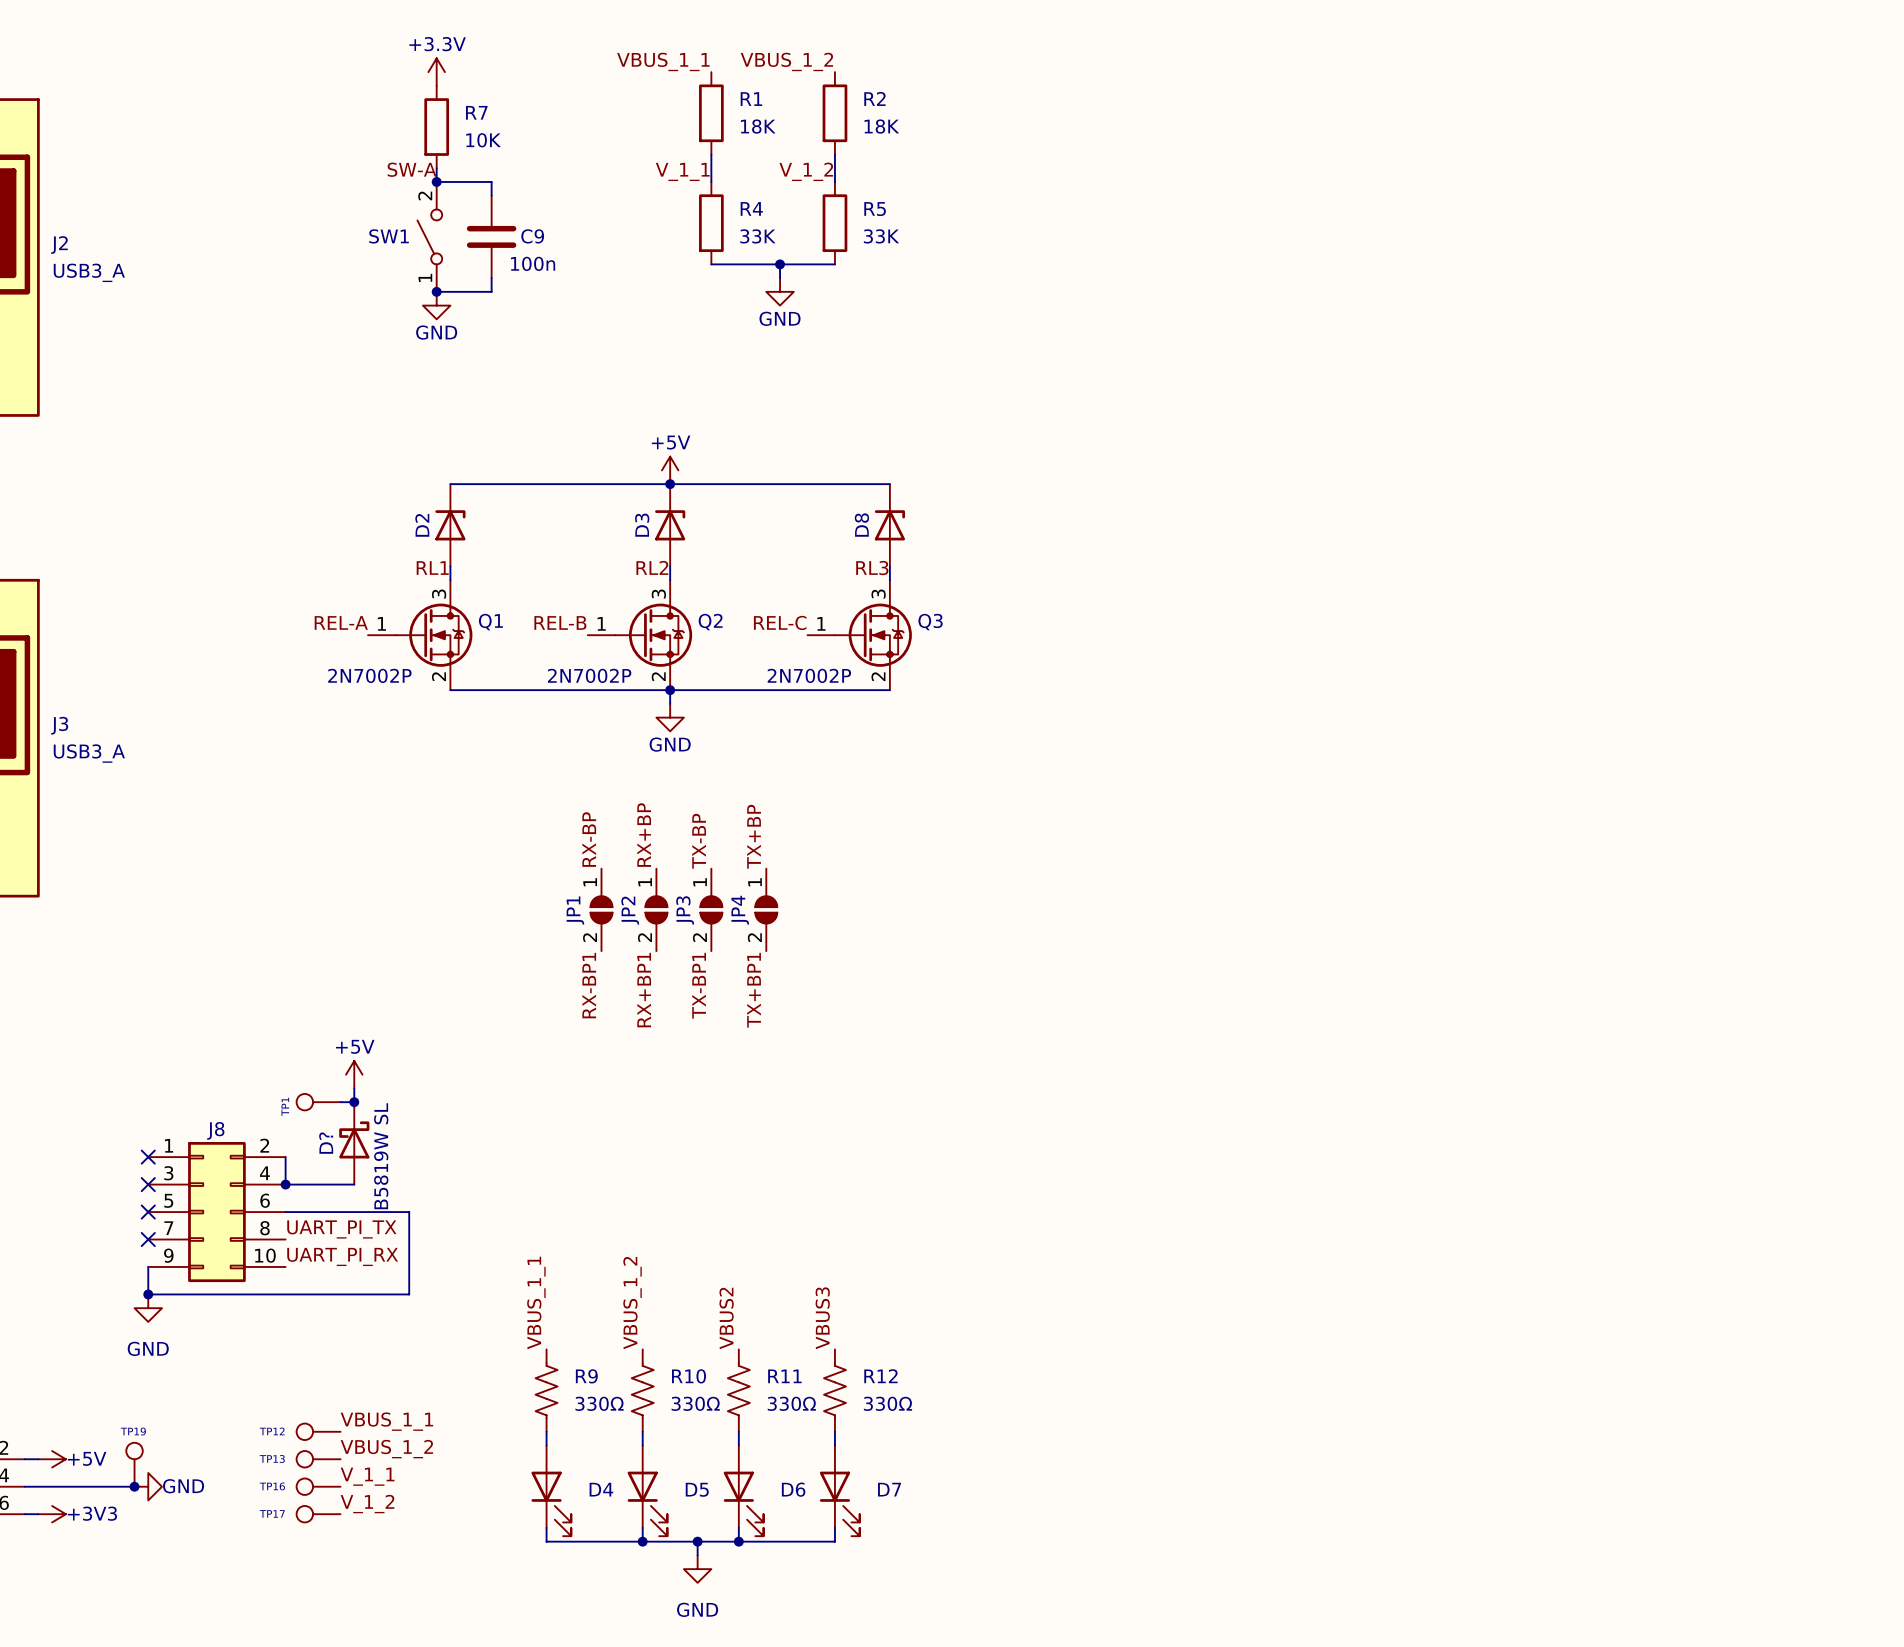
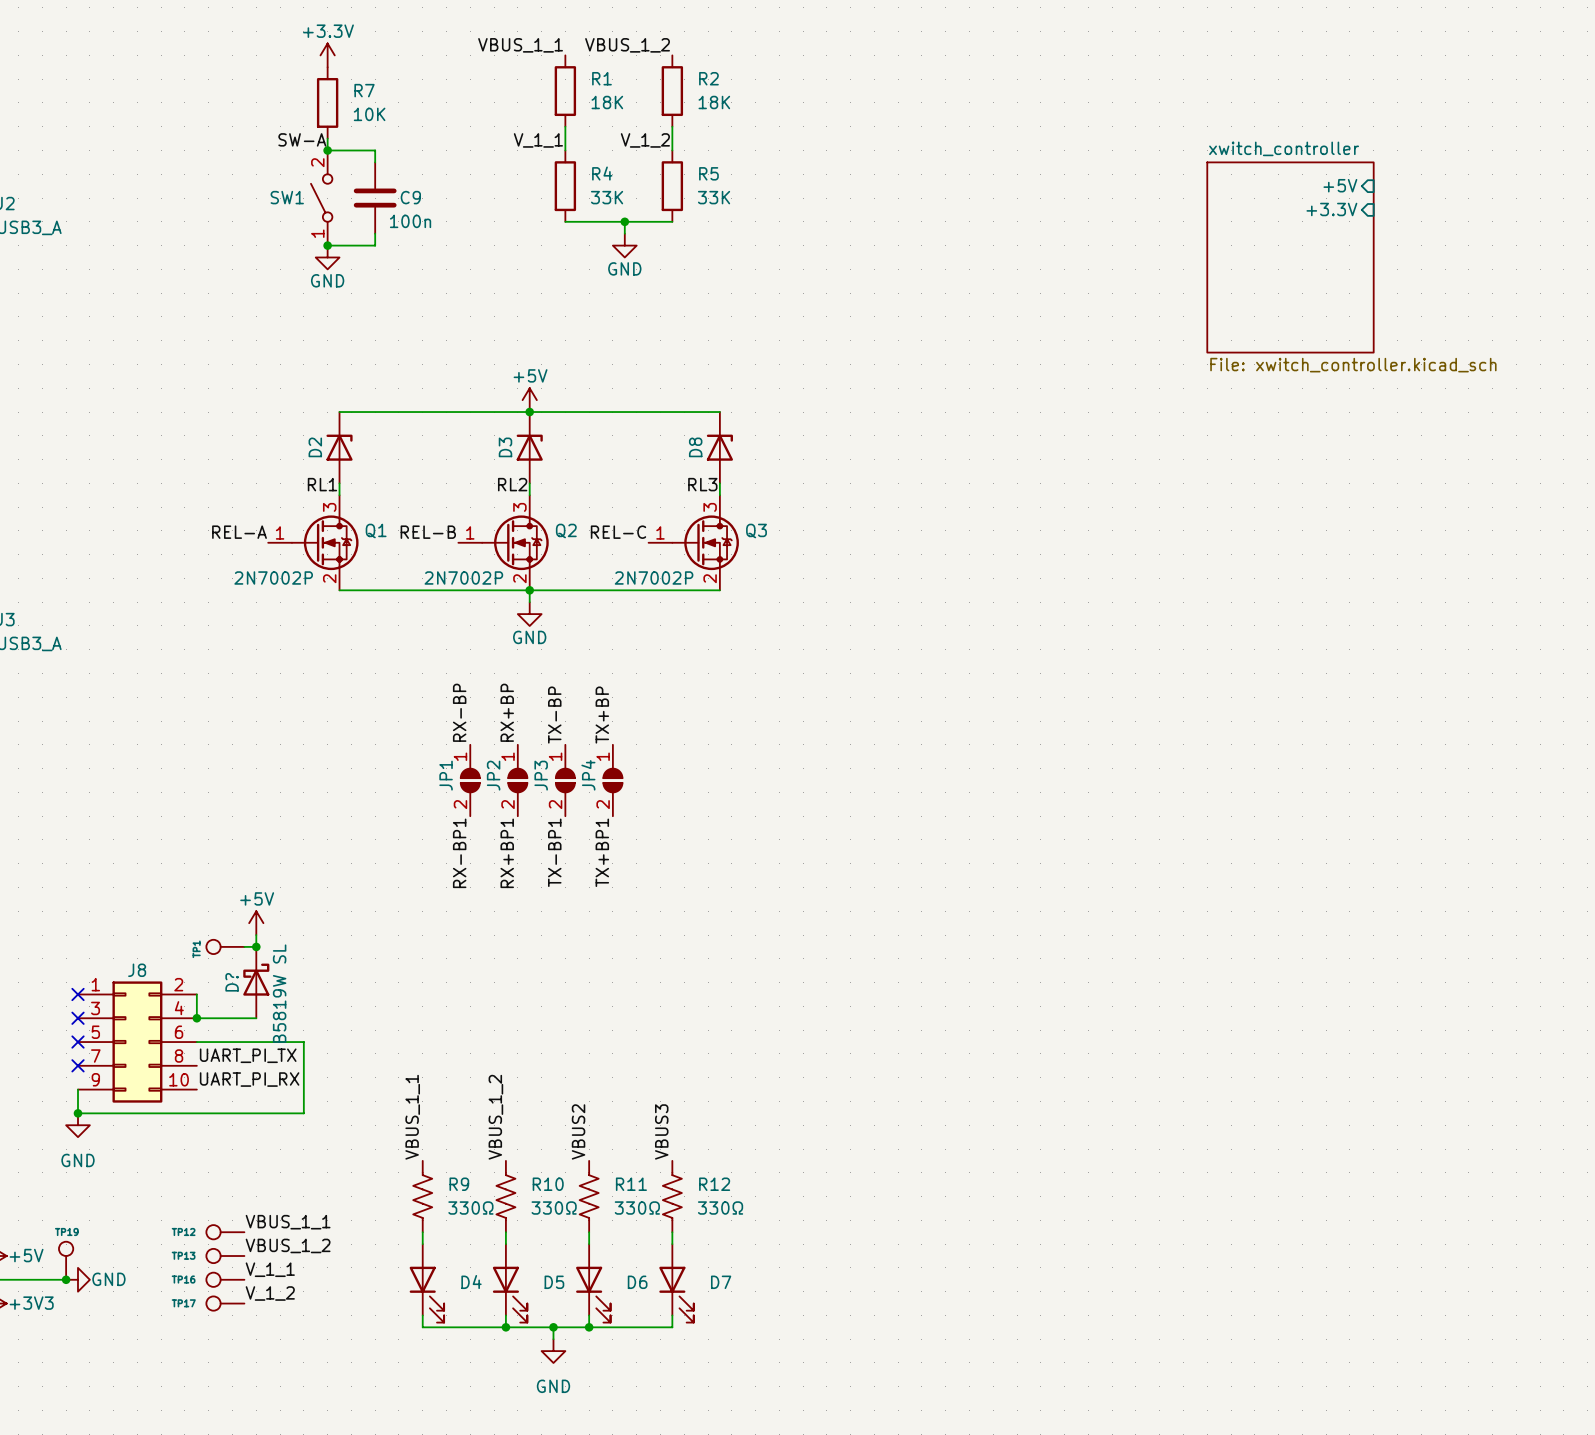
sheet pin: none -> +5V (1340, 185)
sheet pin: none -> +3.3V (1331, 209)
sheet xwitch_controller: none -> File: xwitch_controller.kicad_sch (1290, 257)

